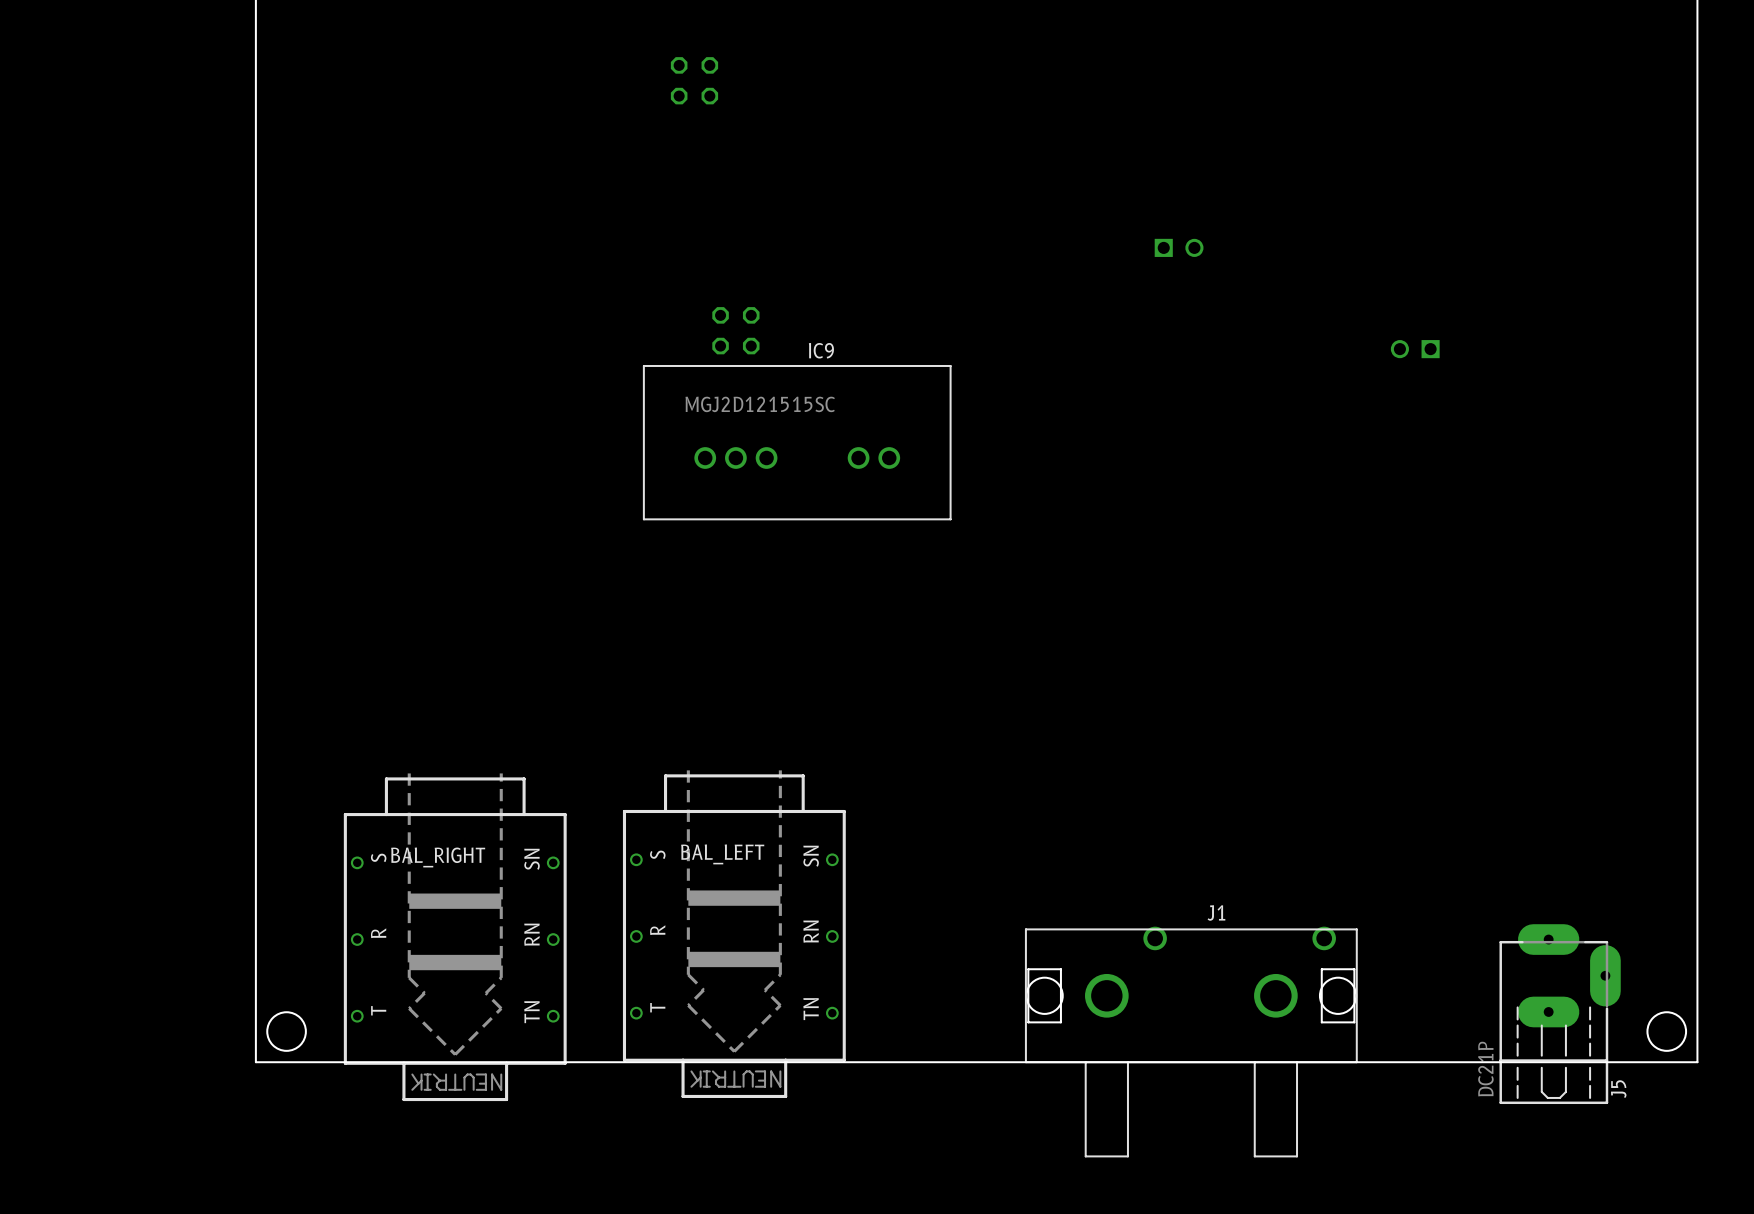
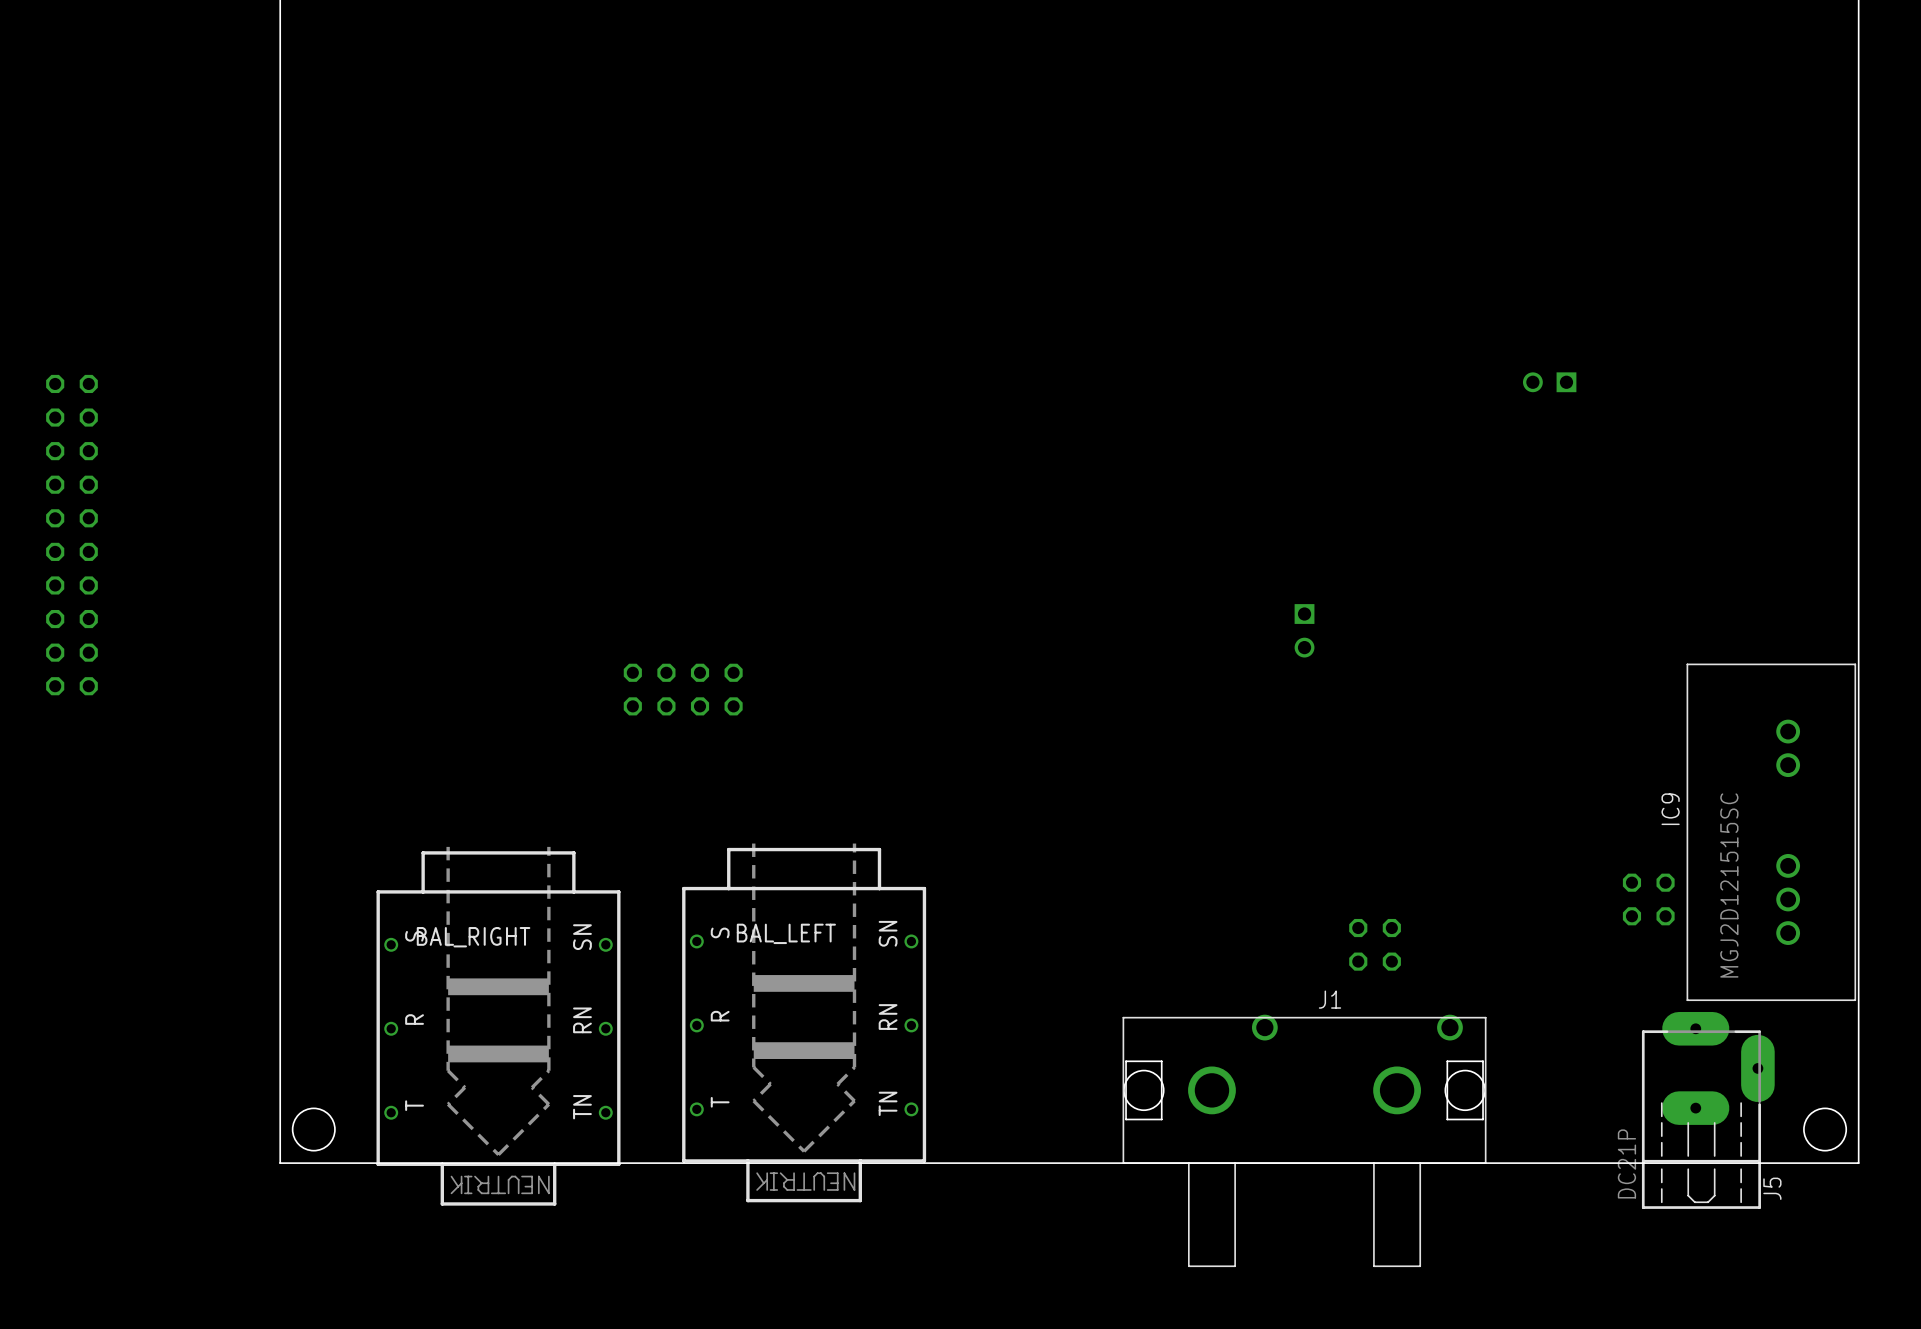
part: (694, 80) -> none
part: (1179, 247) -> none
part: (735, 330) -> none
IC9 rotation: 0° (797, 442) -> 90° counterclockwise (1771, 832)
IC9 position: (797, 442) -> (1771, 832)
part: none -> (71, 535)
part: none -> (1304, 630)
part: none -> (683, 689)
part: none -> (1648, 899)
part: none -> (1375, 944)

